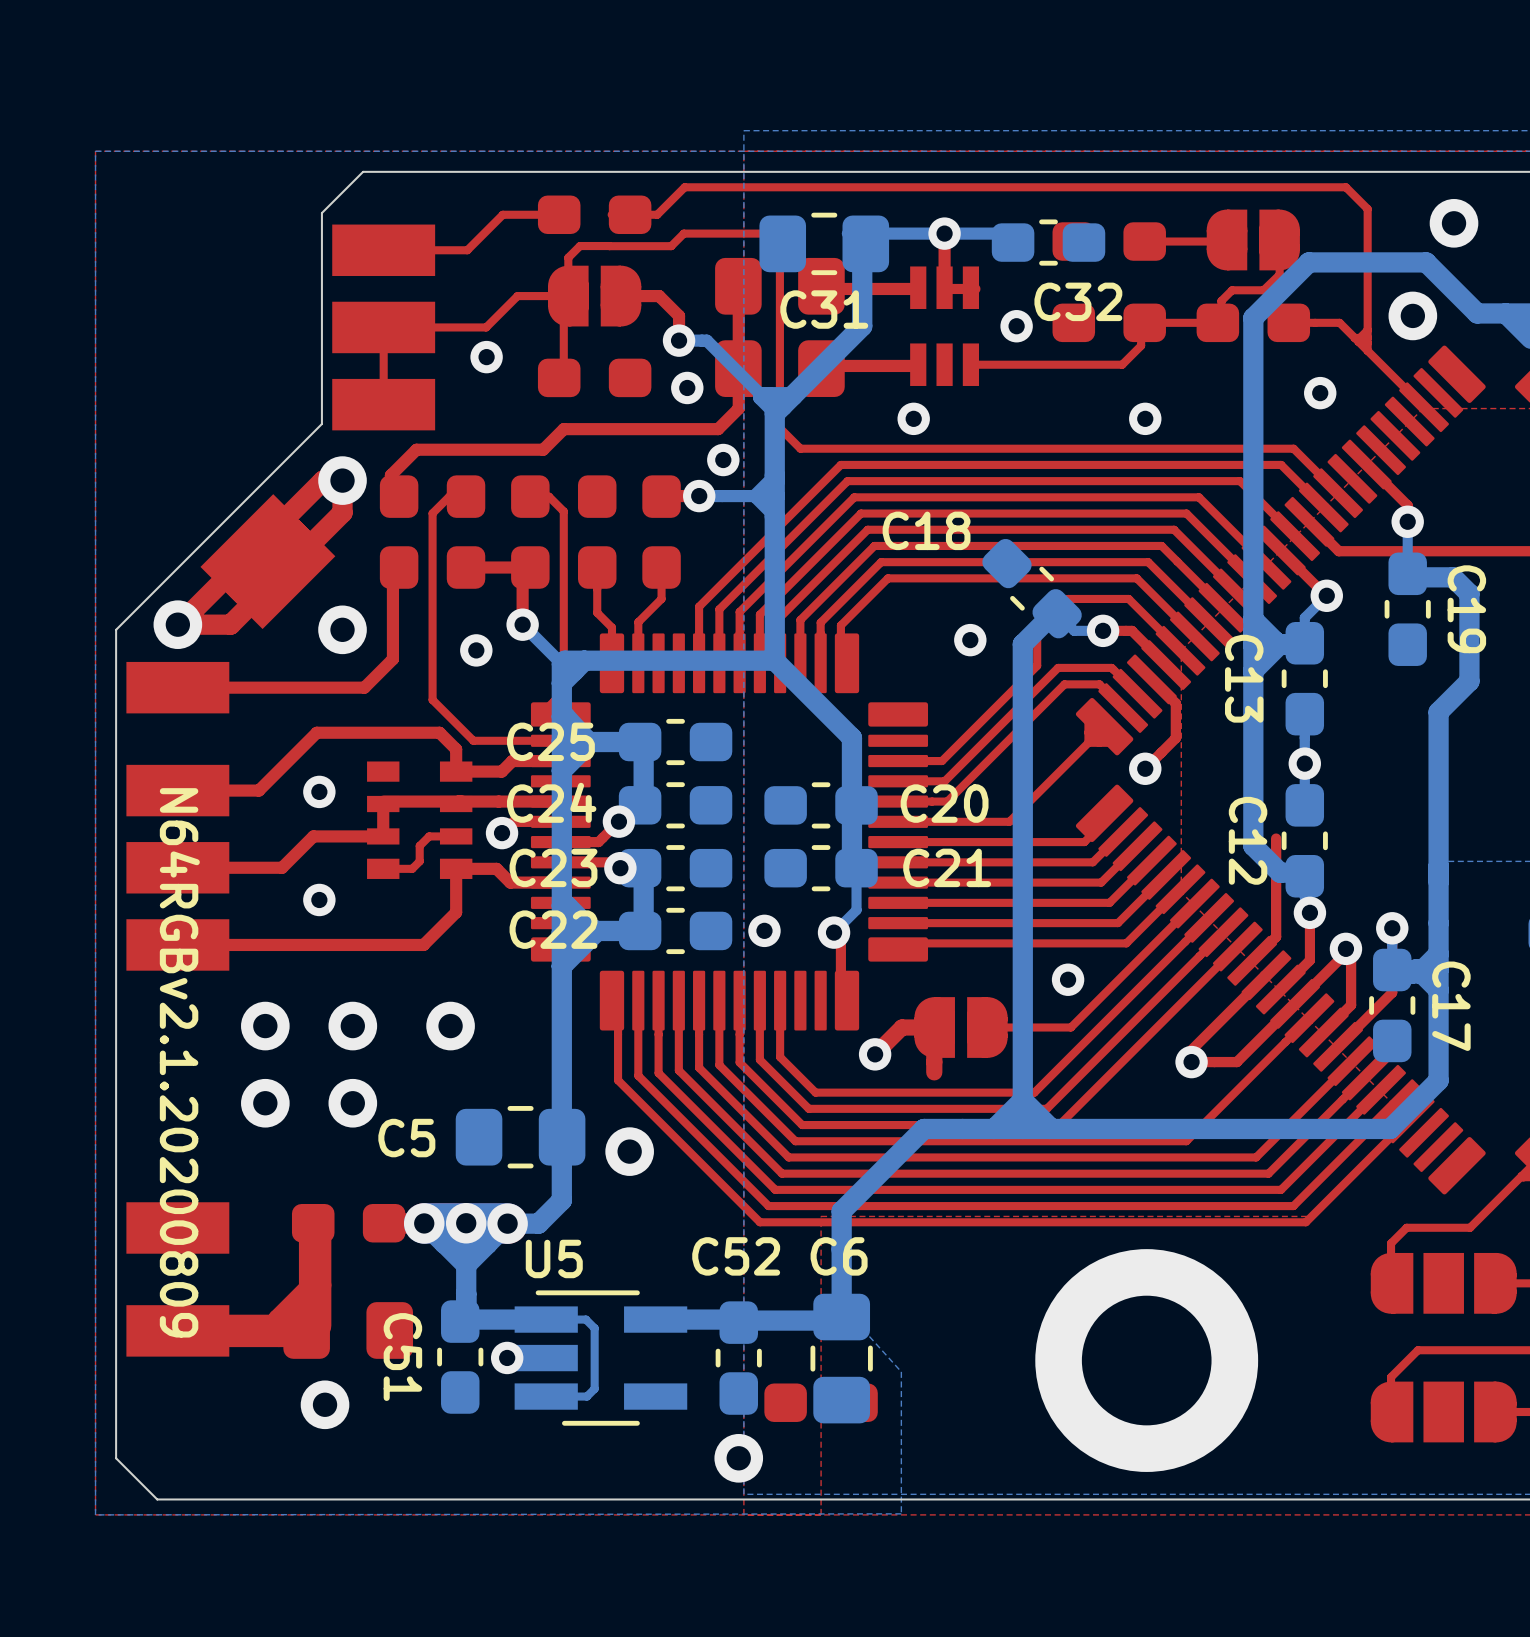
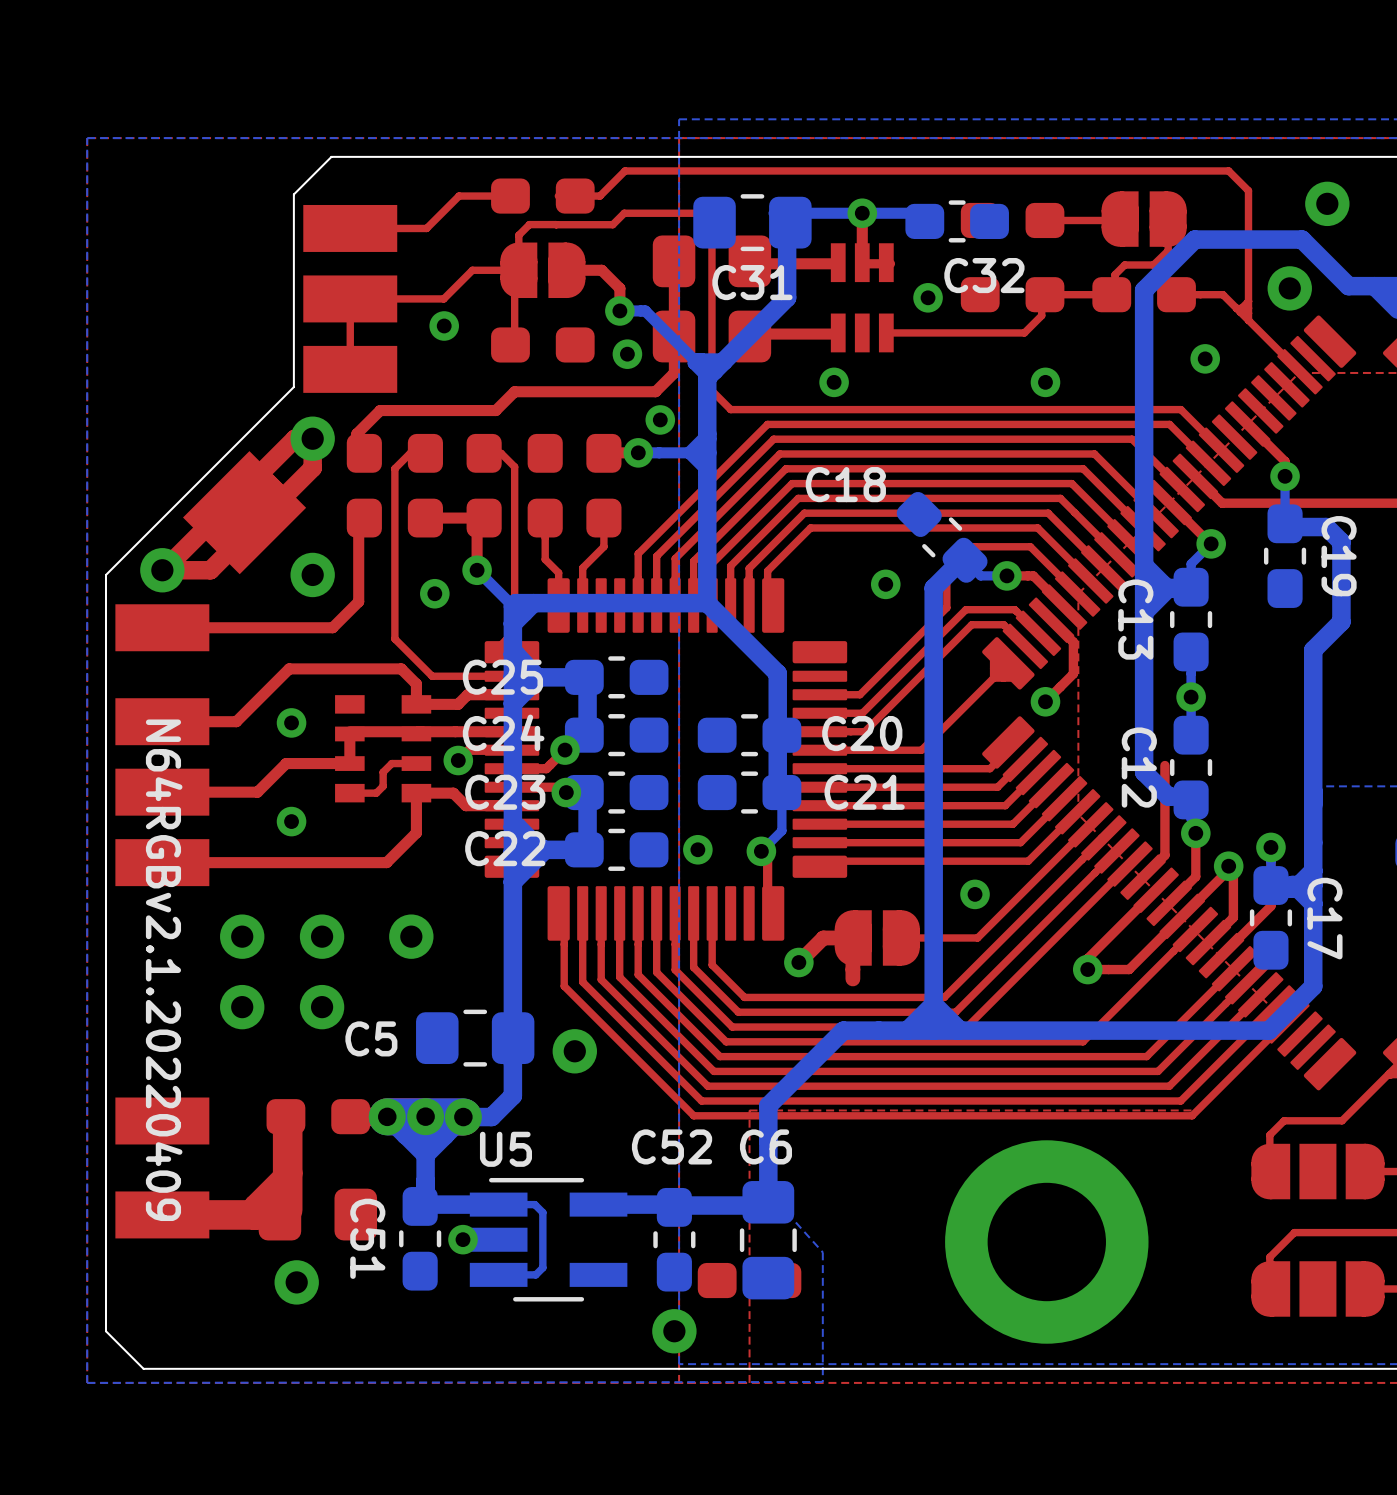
text: N64RGBv2.1.20200809 (179, 1062) -> N64RGBv2.1.20220409 (164, 970)

